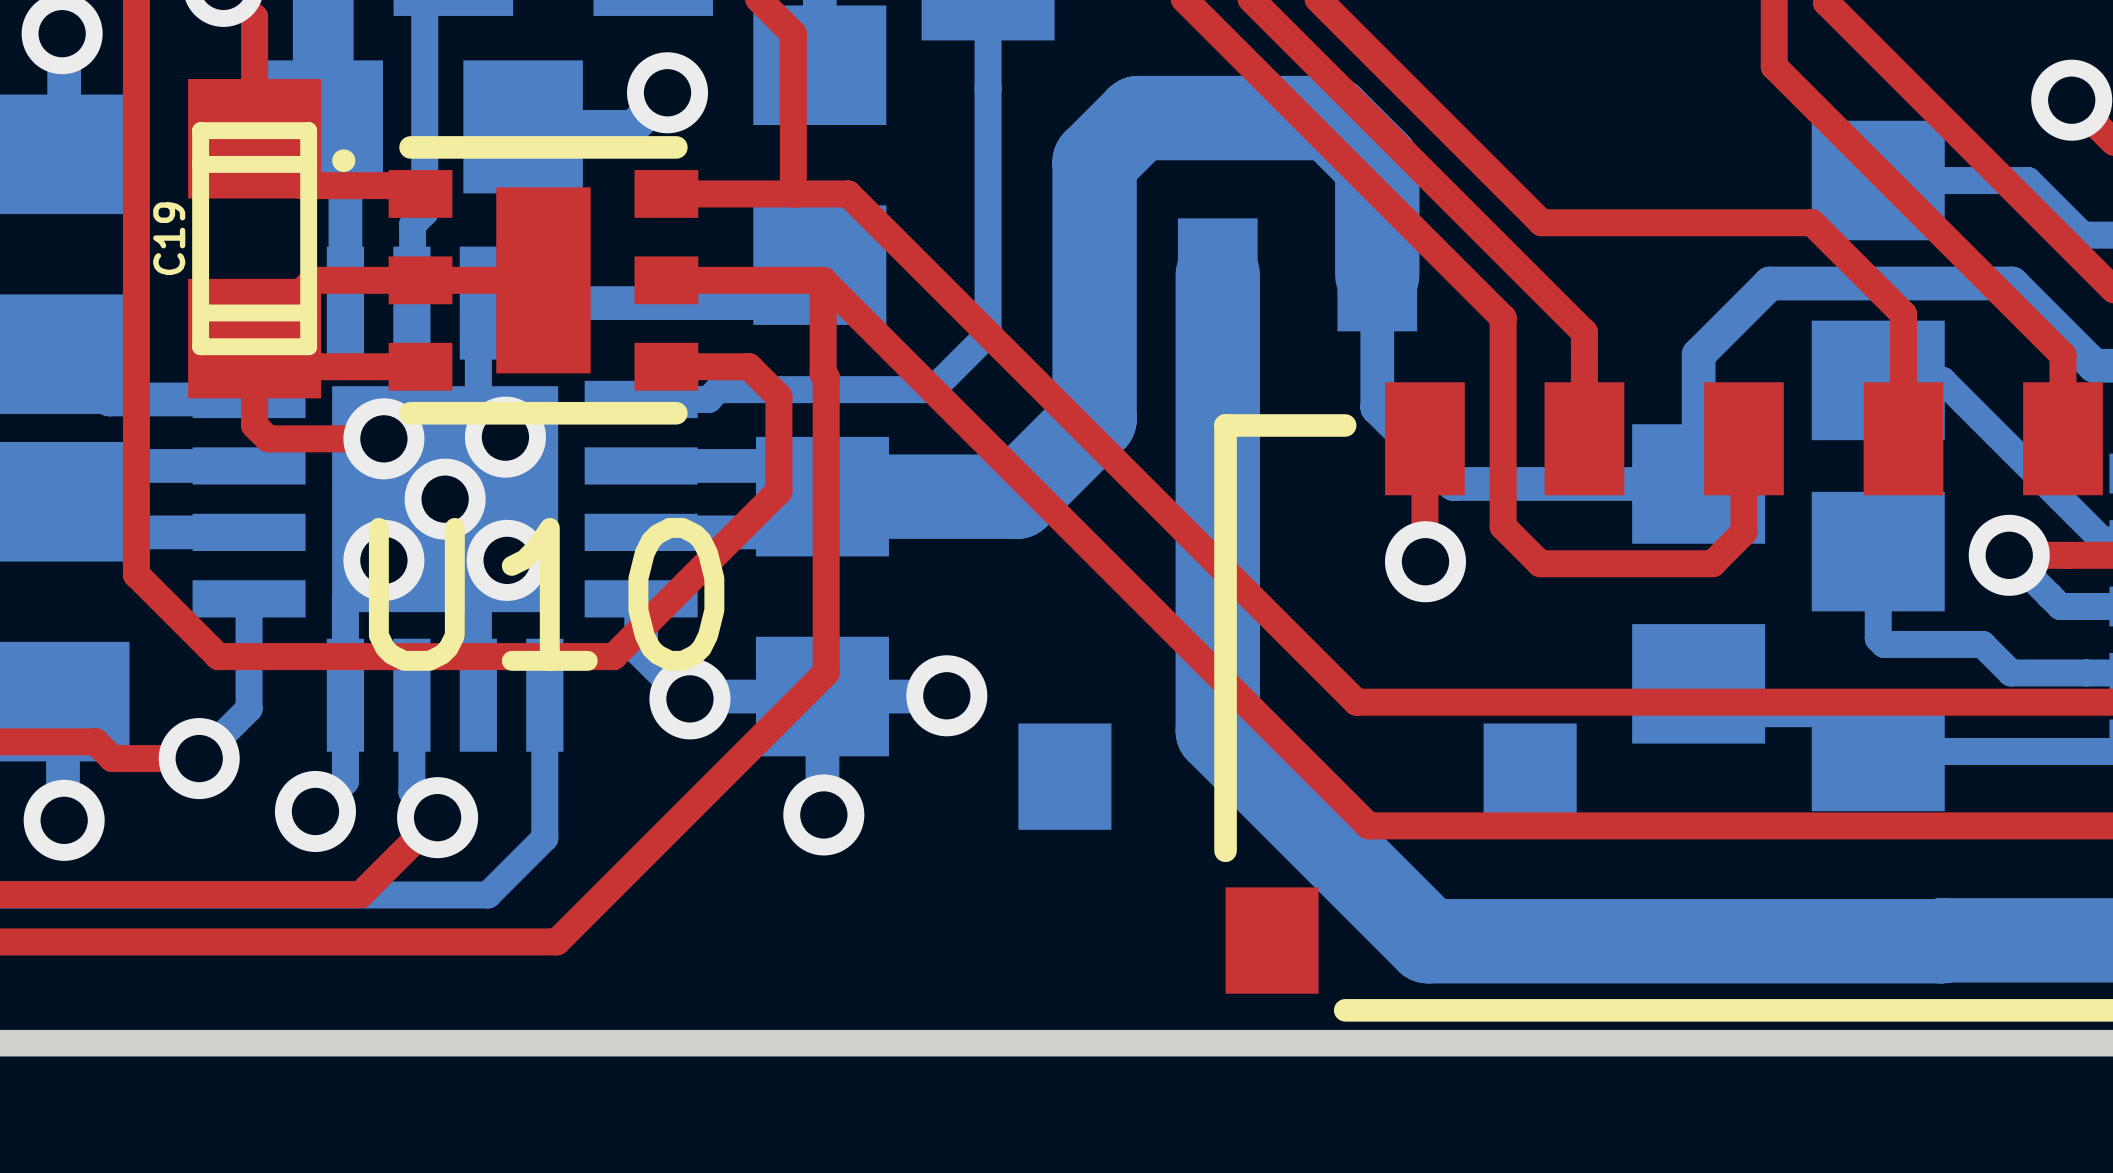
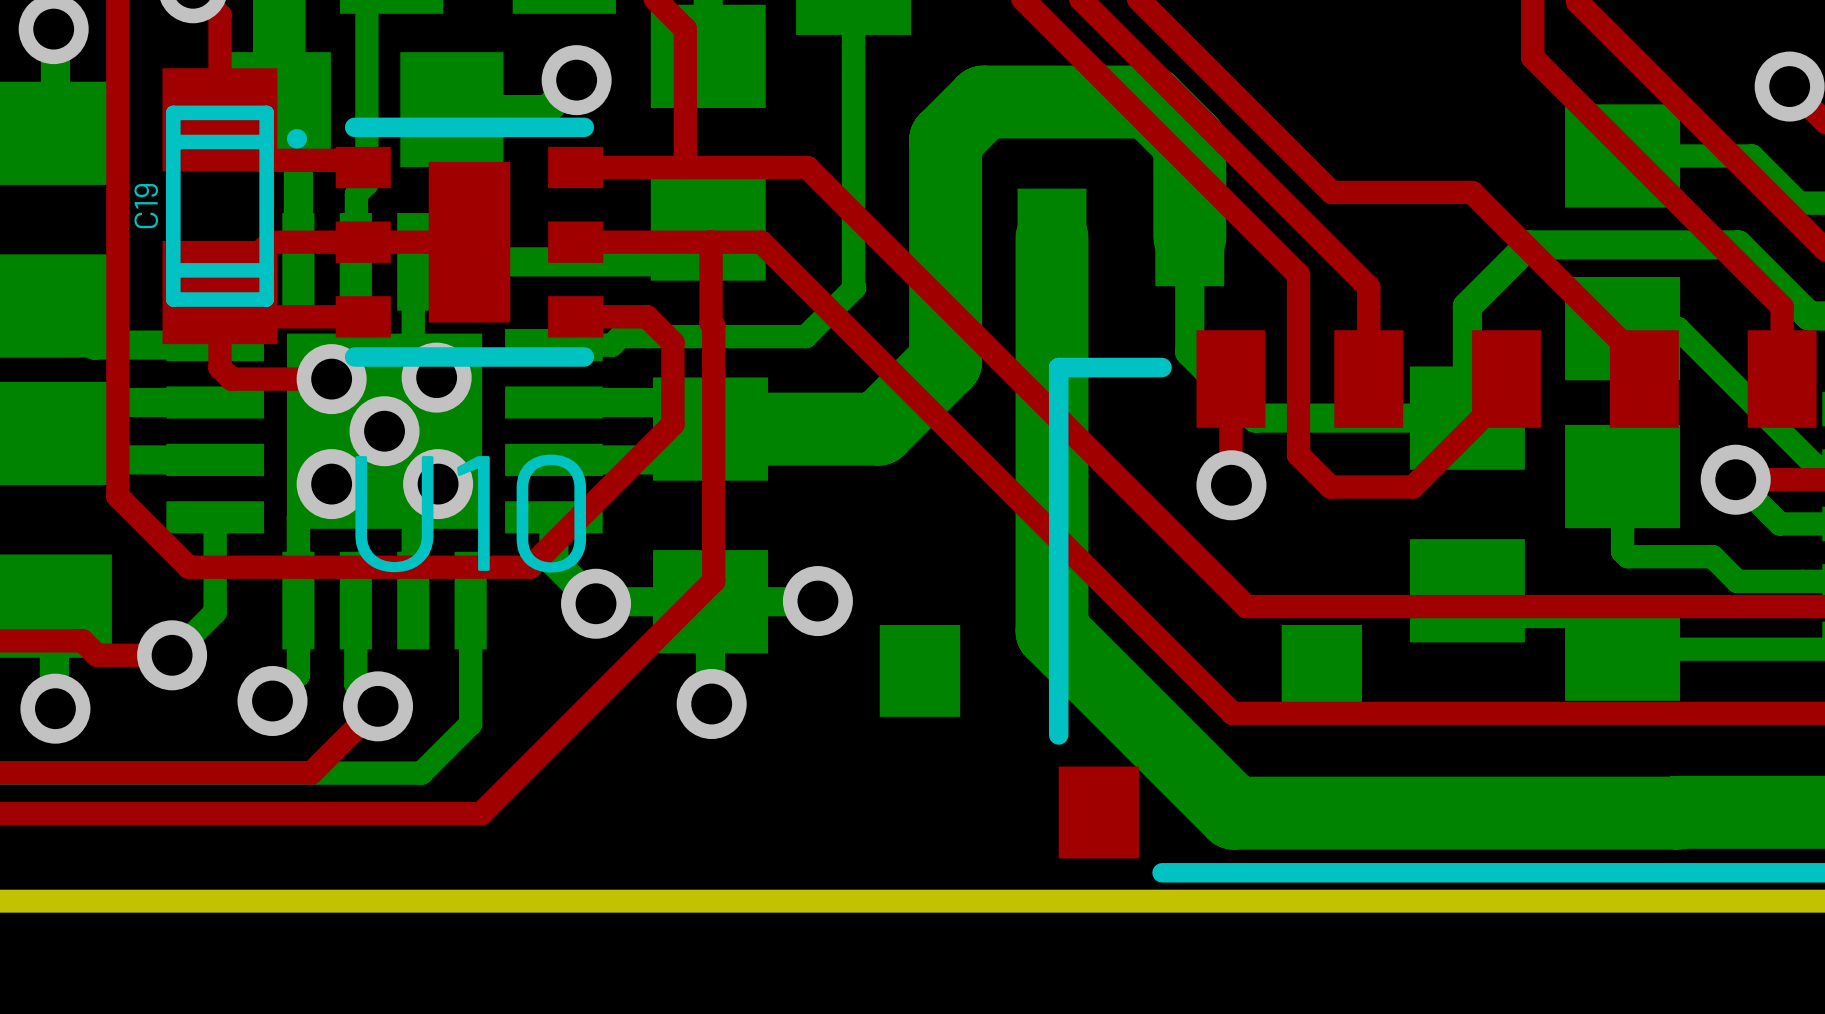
top track: (848, 193) (1356, 702) (1442, 702) -> (732, 167) (807, 167) (1246, 606)
top track: (1704, 222) (1812, 222) (1903, 314) (1903, 422) -> (1472, 192) (1644, 364)
top track: (826, 283) (1368, 825) (1426, 825) -> (711, 242) (761, 242) (1232, 713)
top track: (1743, 455) (1743, 532) (1712, 563) (1635, 563) -> (1506, 393) (1412, 487)

